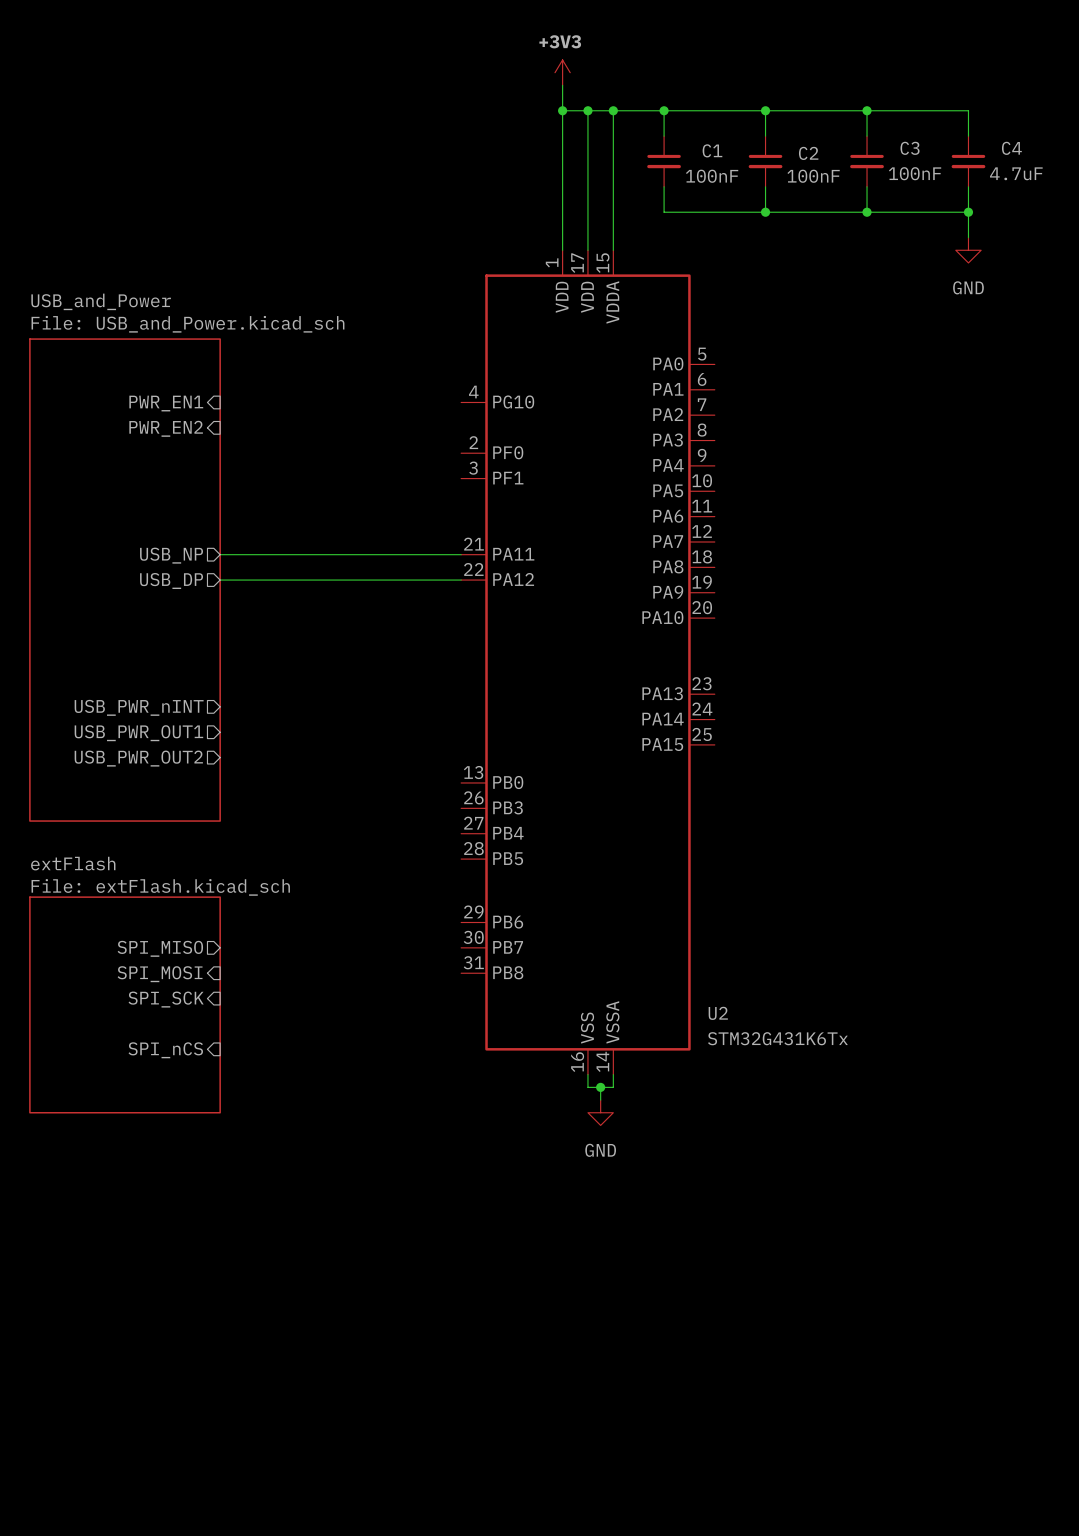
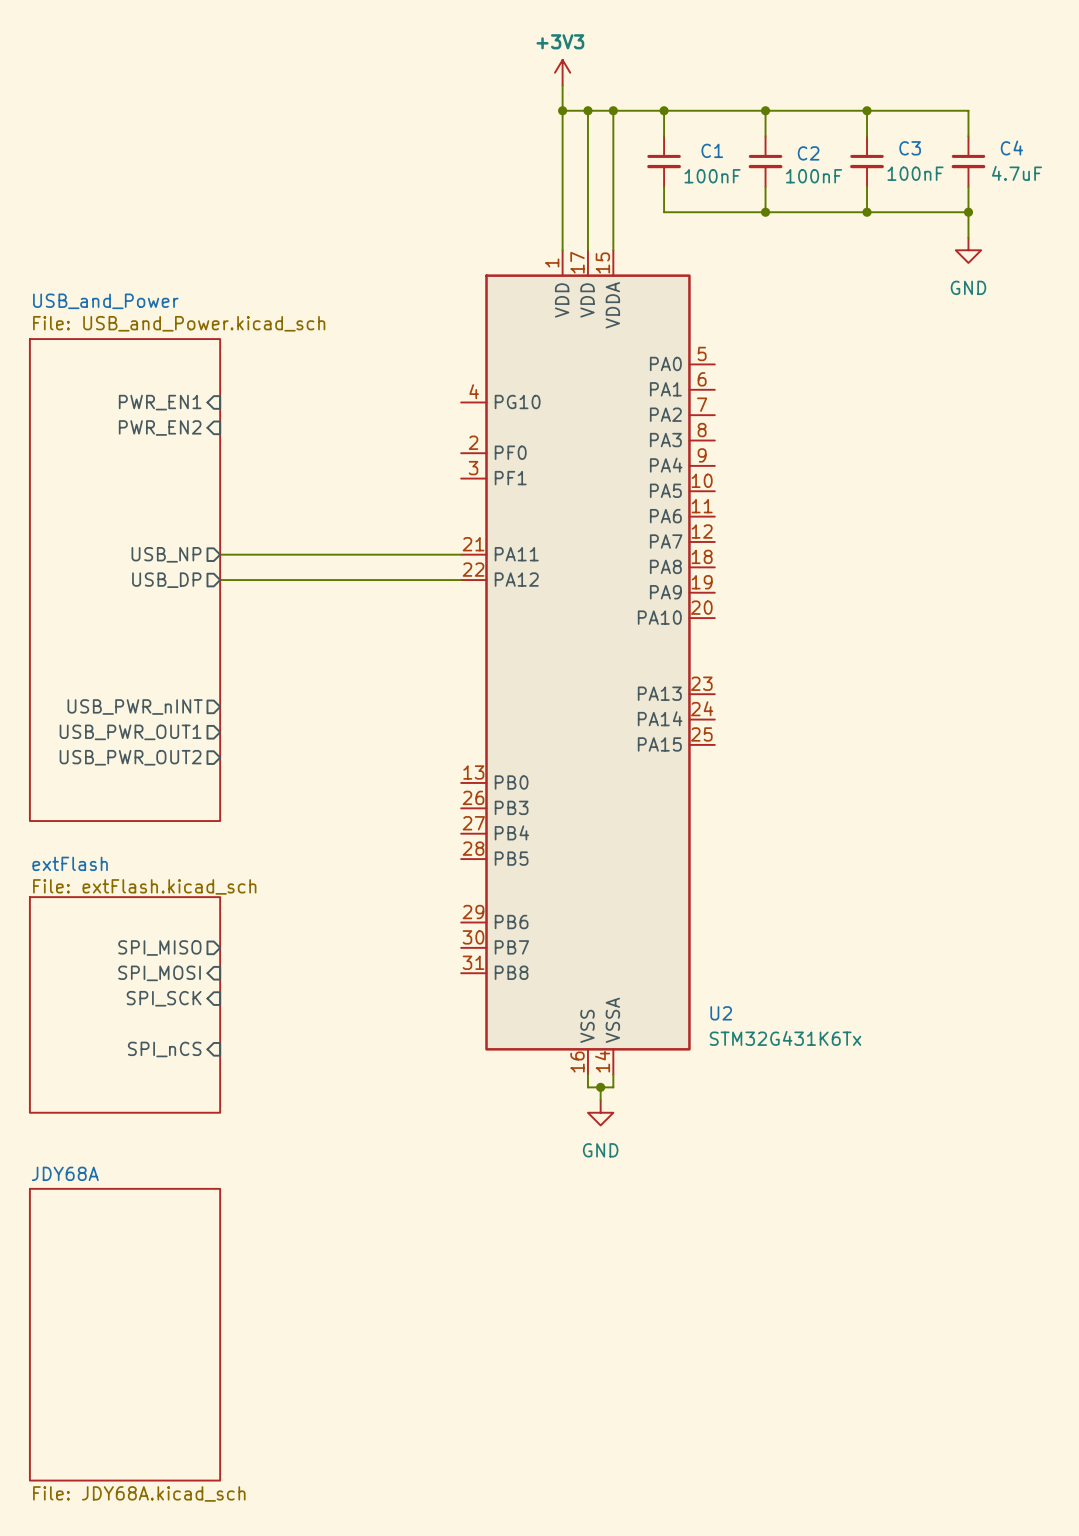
sheet JDY68A: none -> File: JDY68A.kicad_sch (125, 1334)

